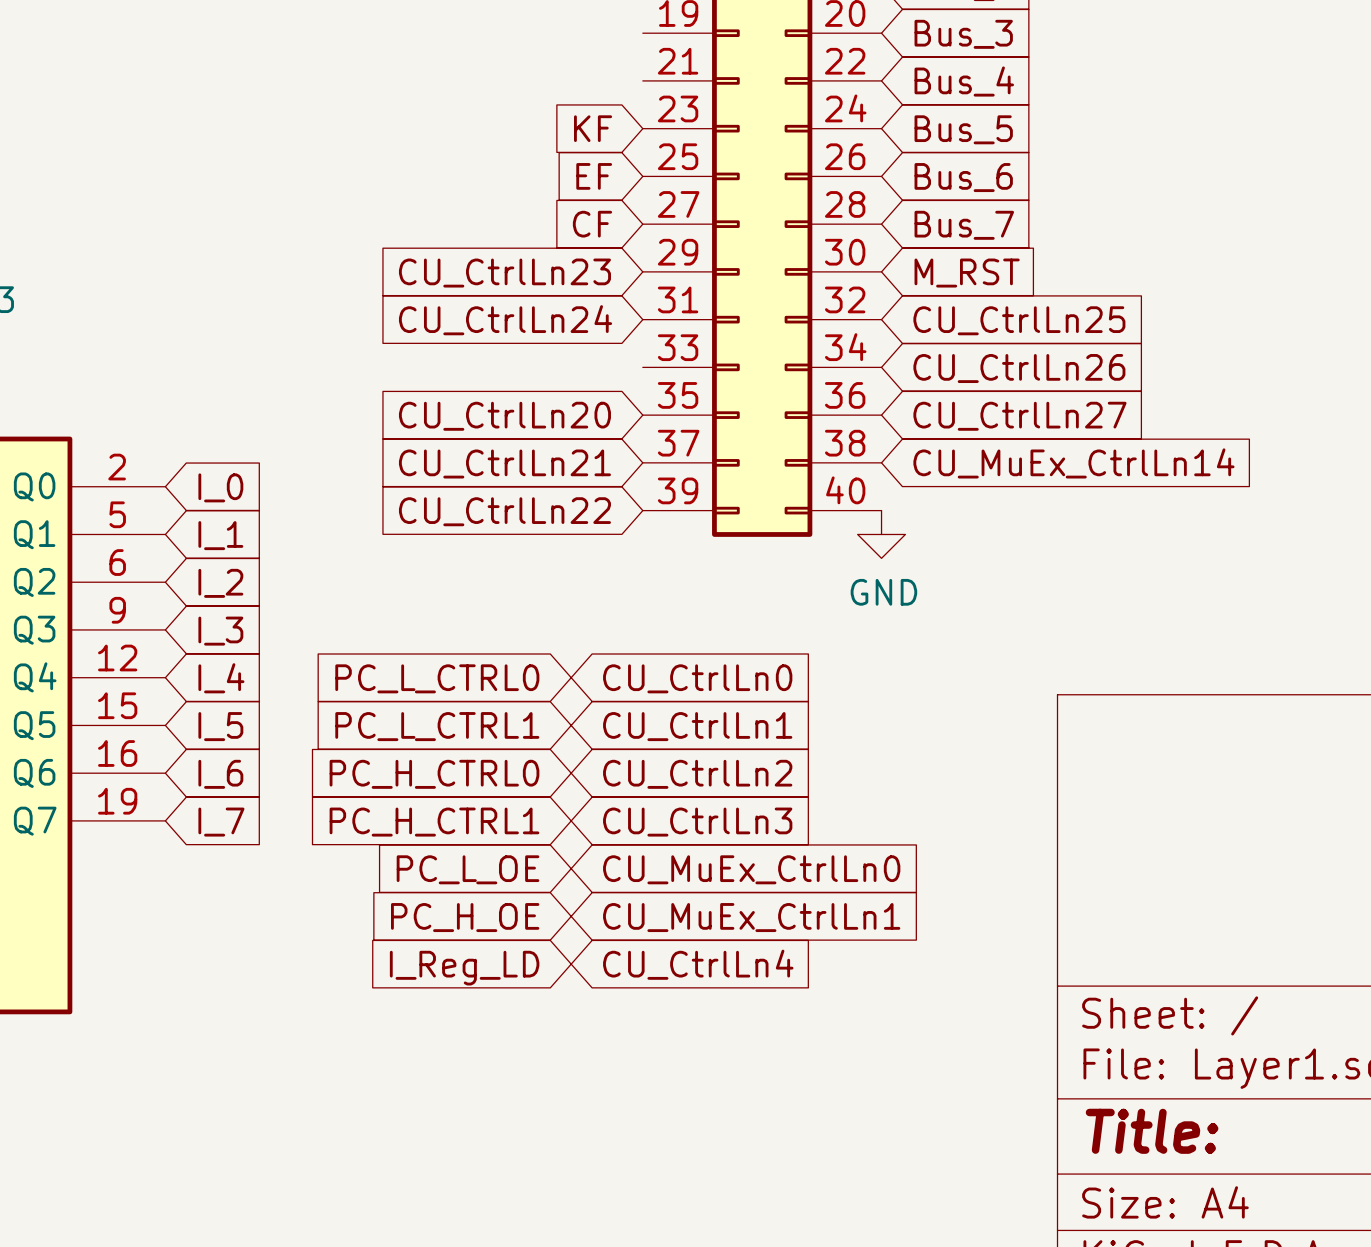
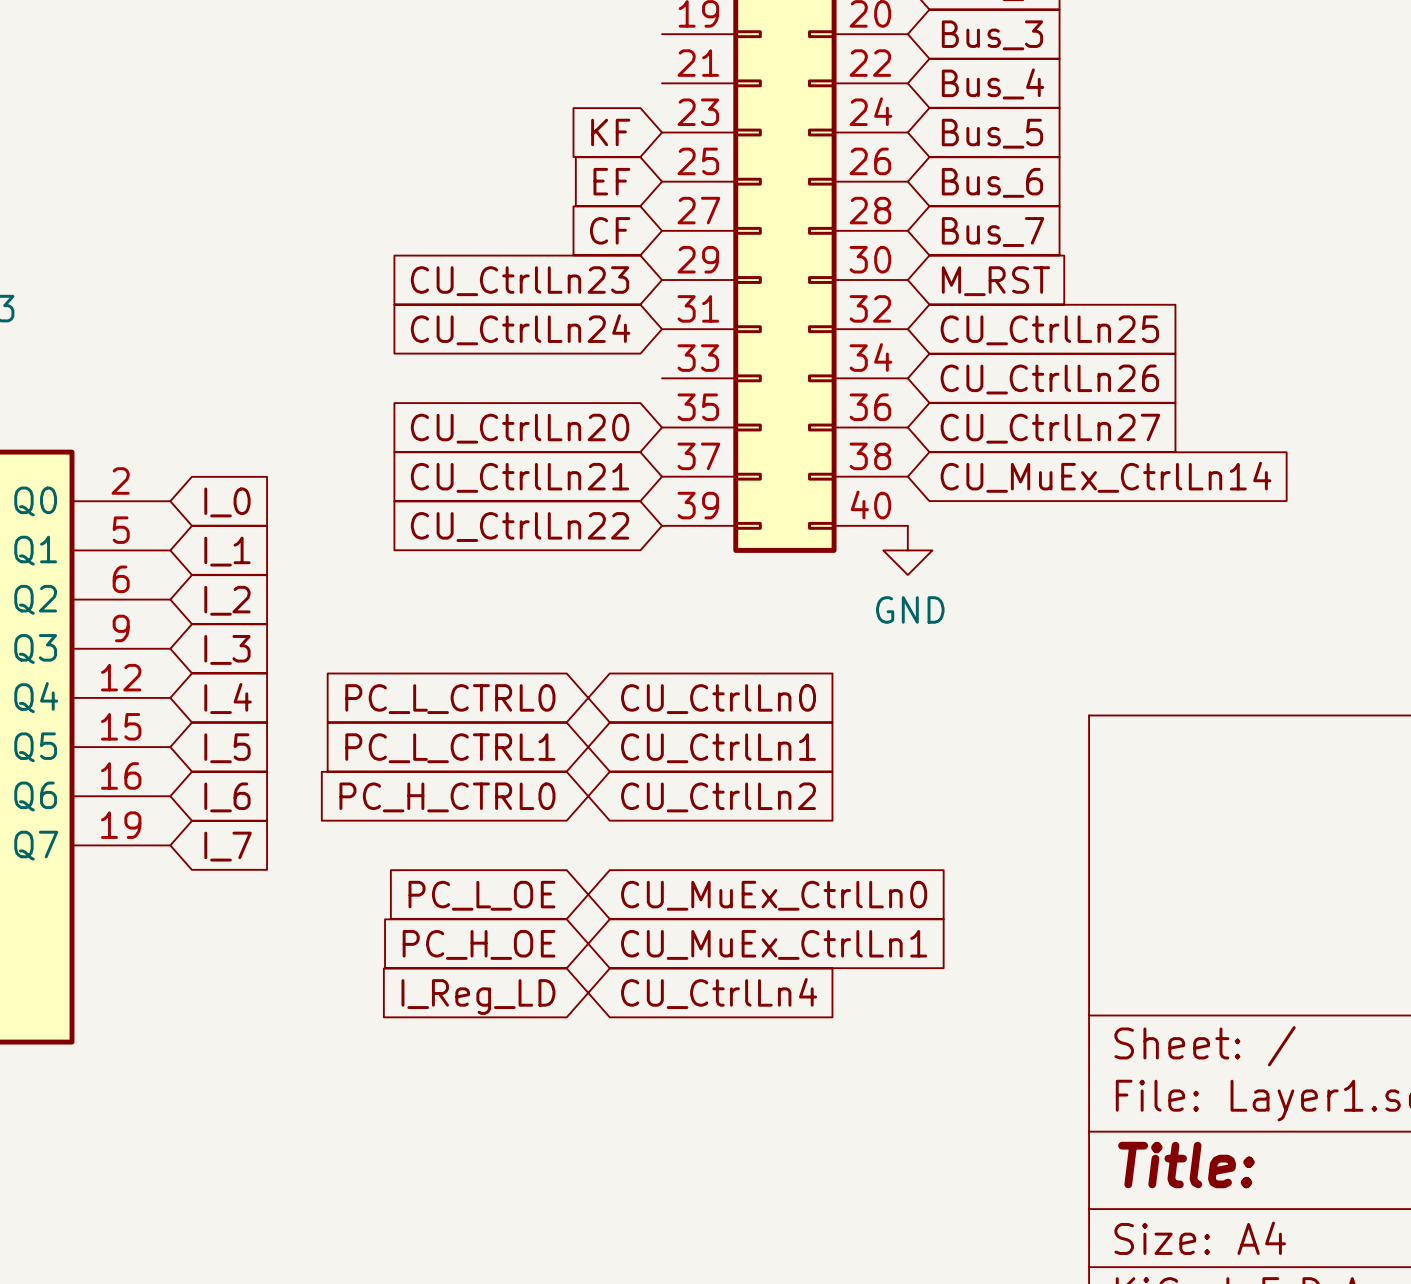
global label: PC_H_CTRL1 (434, 822) -> none
global label: CU_CtrlLn3 (697, 822) -> none

